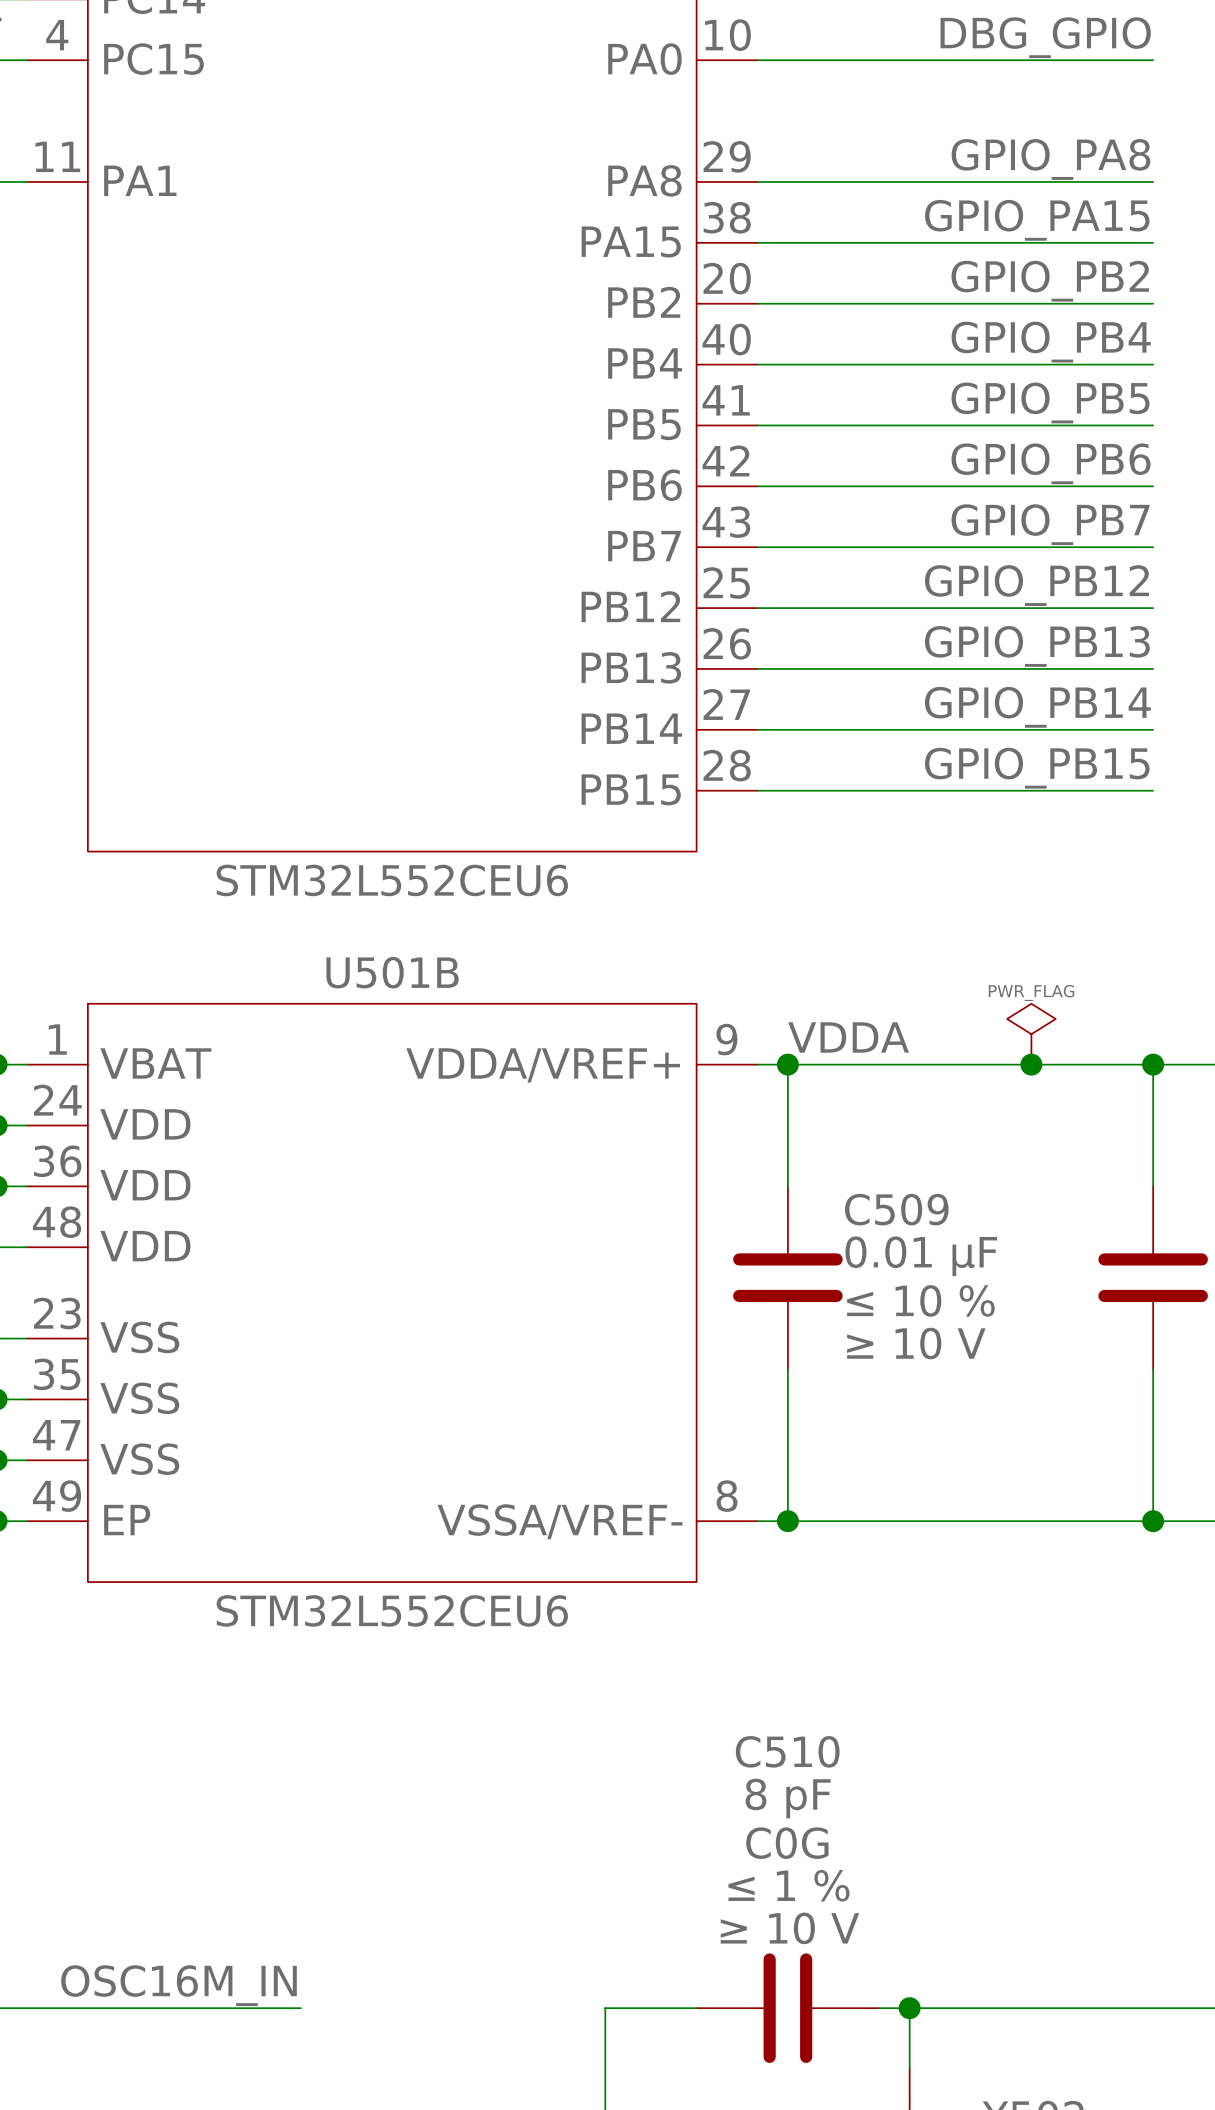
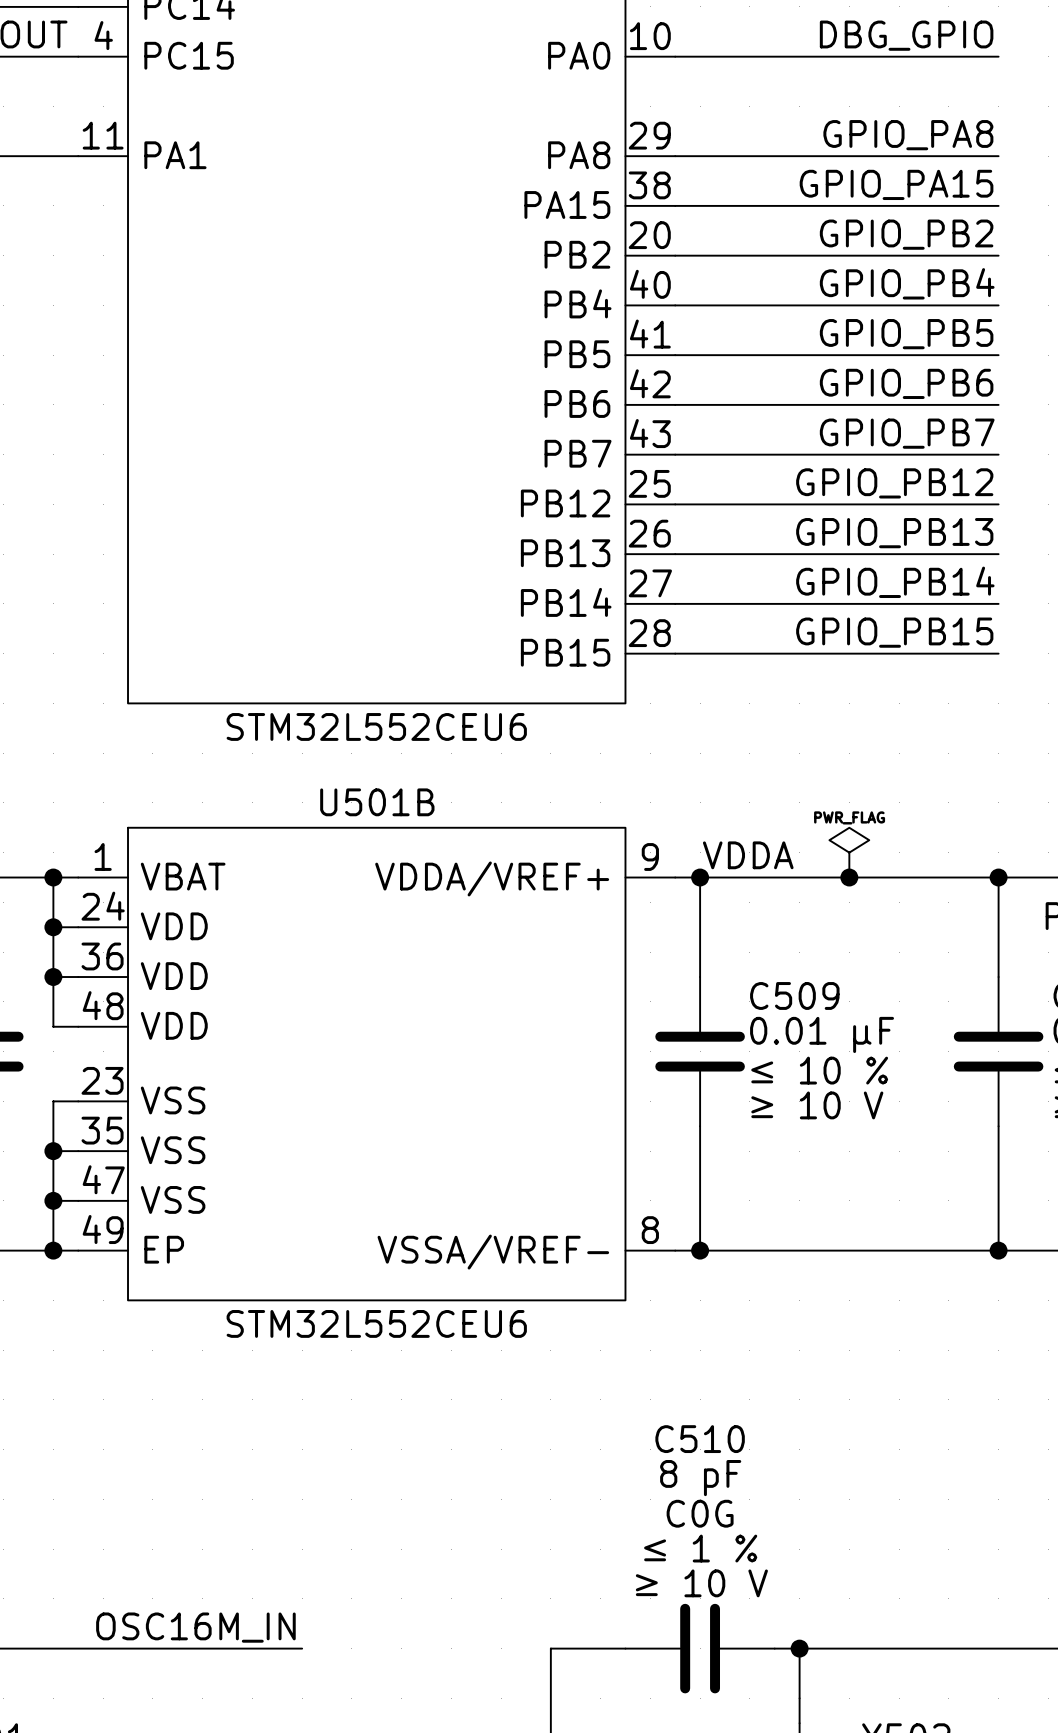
power symbol position: PWR_FLAG (1031, 1034) -> PWR_FLAG (849, 852)
junction position: (1031, 1064) -> (849, 877)

